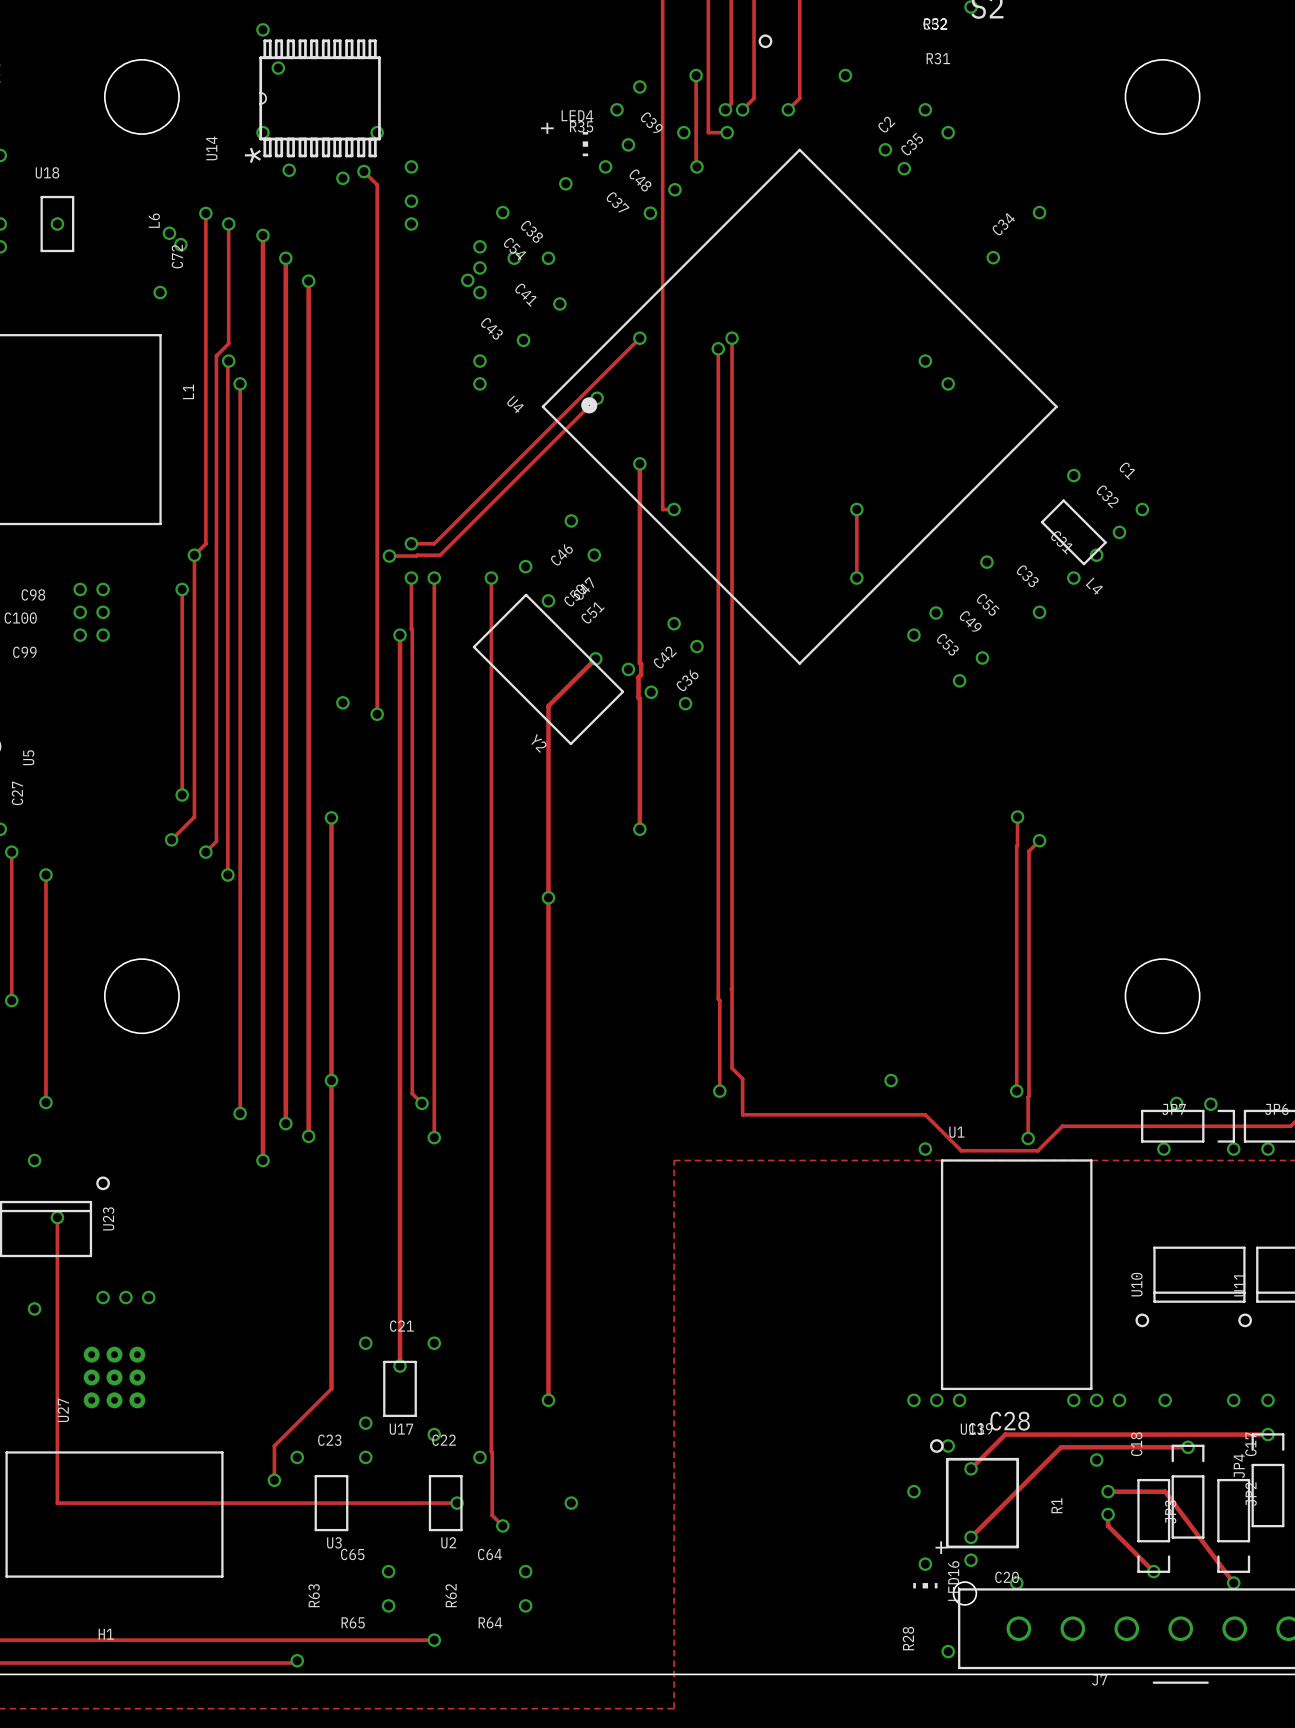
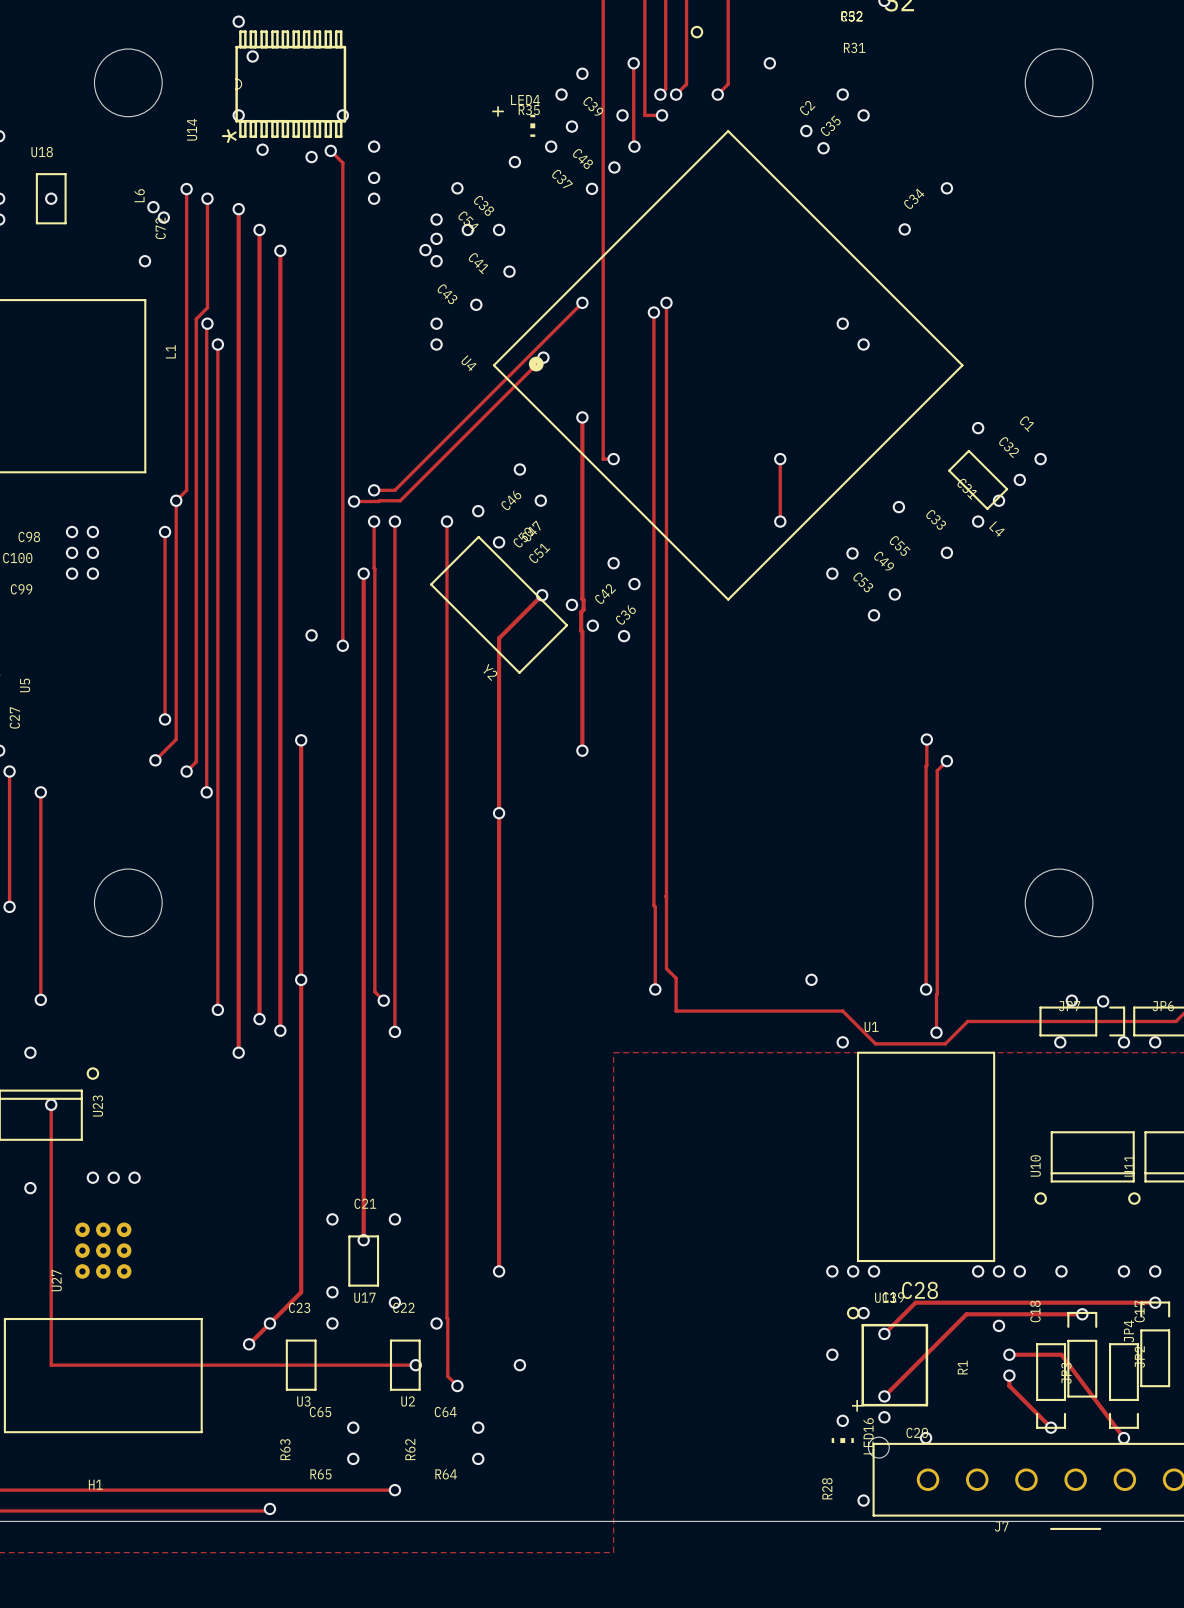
track: (331, 1388) (274, 1446) (274, 1480) -> (301, 1261) (301, 1292) (249, 1344)

